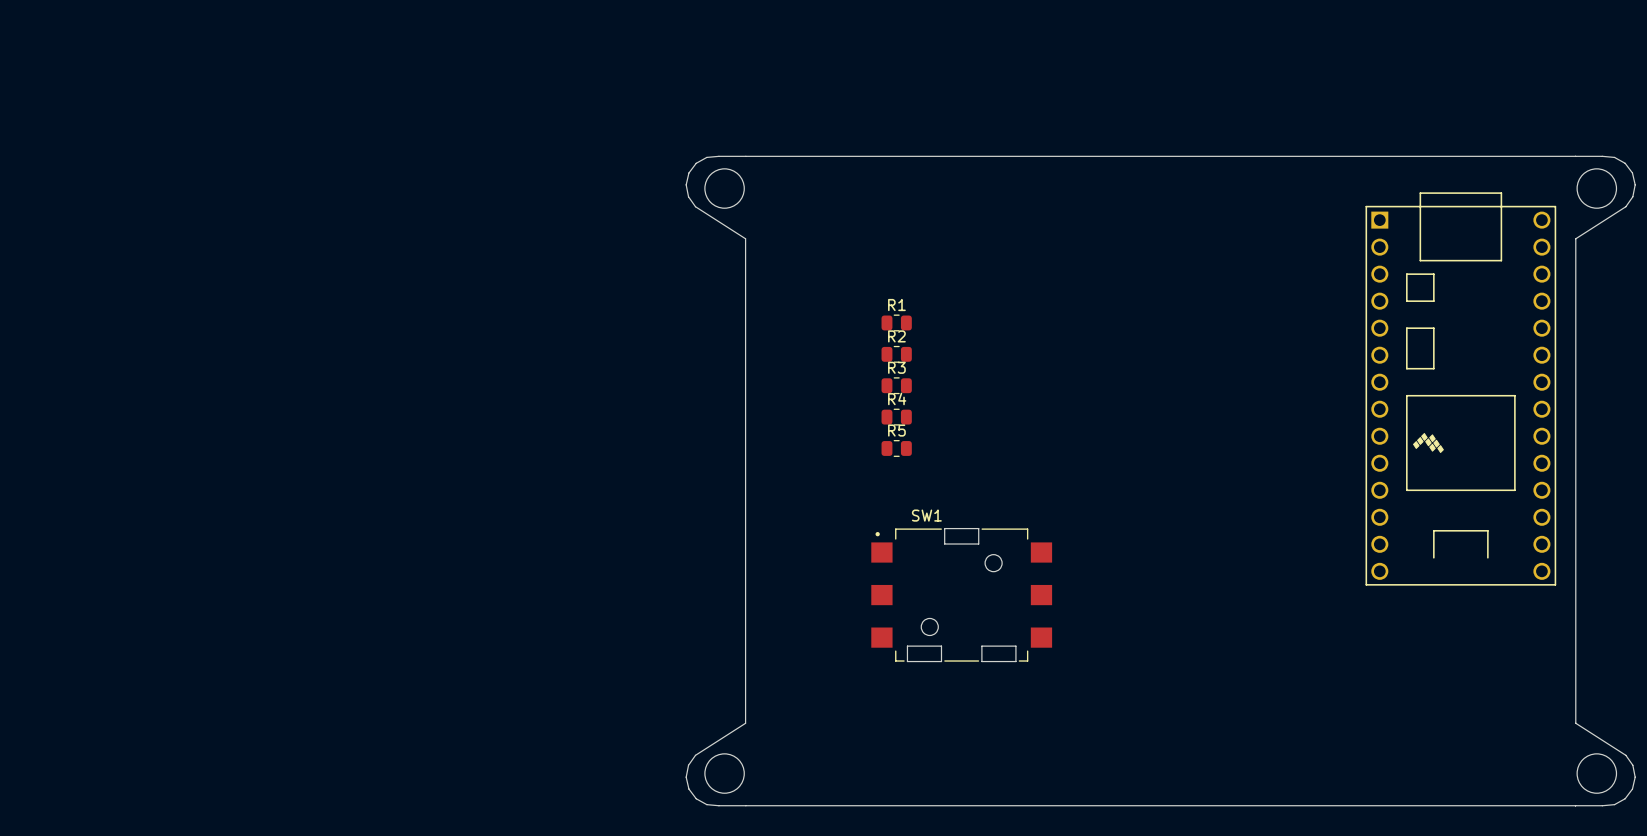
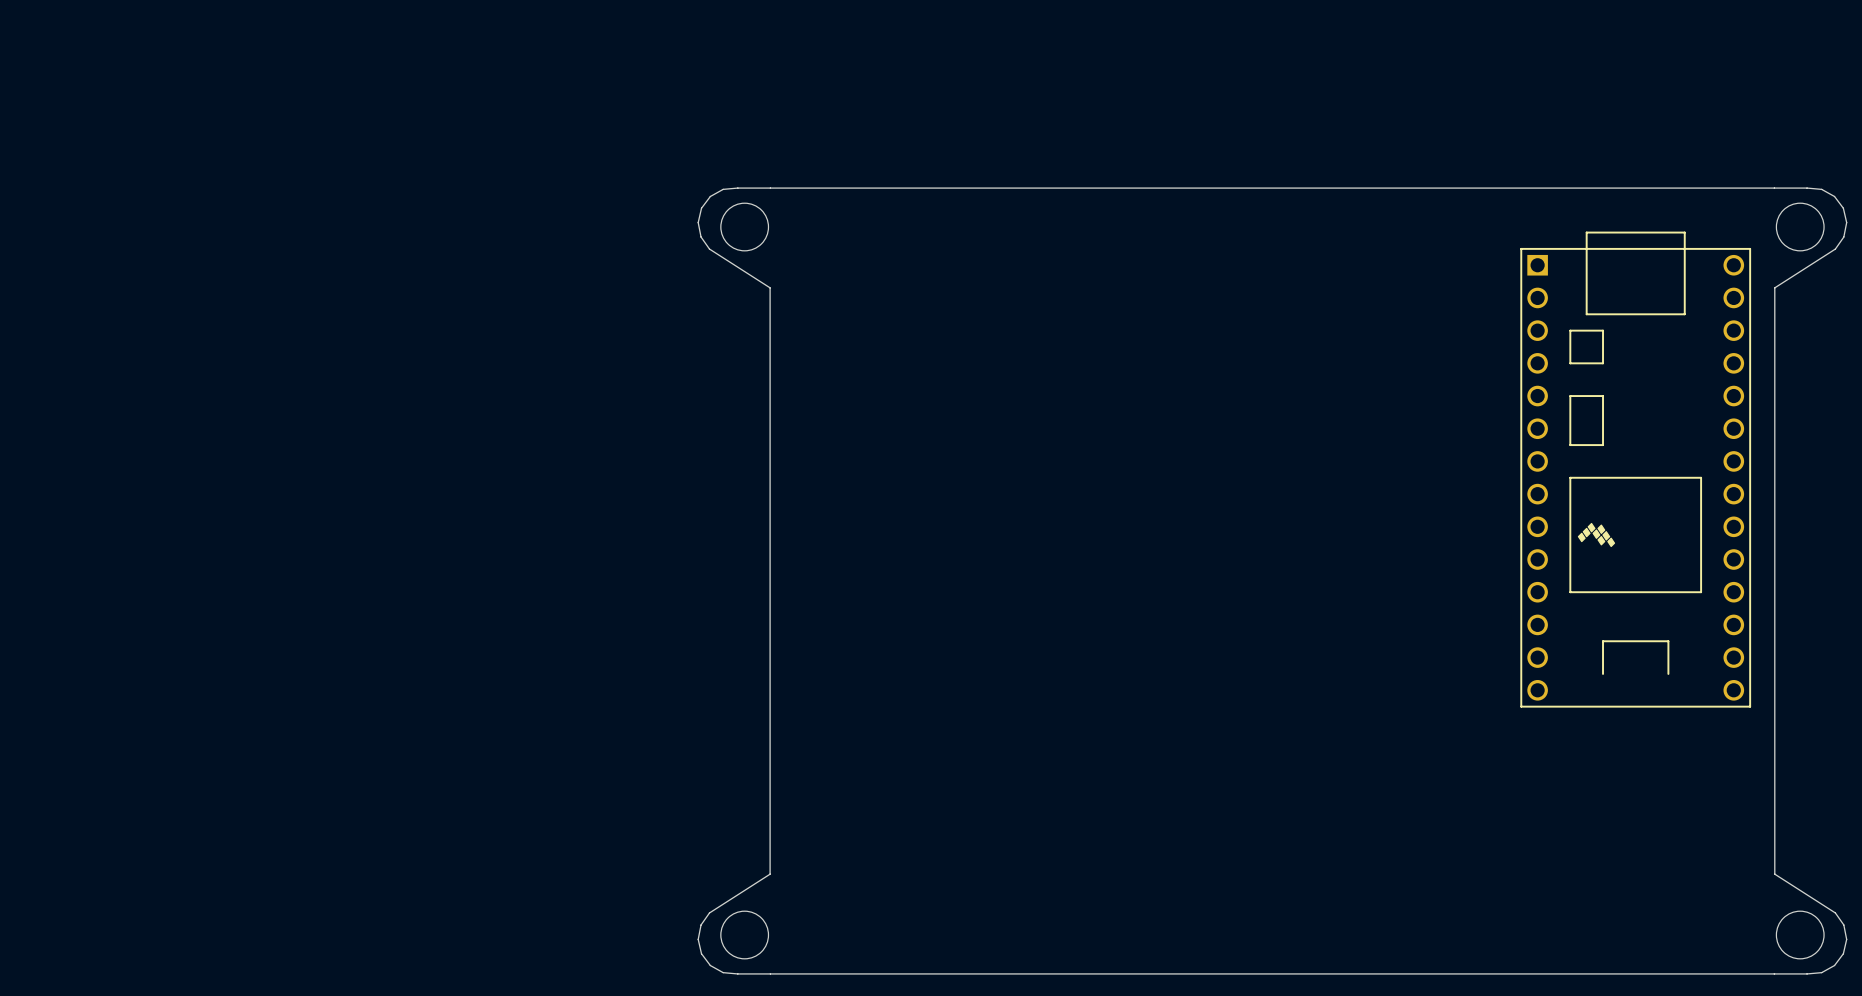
R1: (896, 322) -> none
R2: (896, 354) -> none
R3: (896, 385) -> none
R4: (896, 417) -> none
R5: (896, 448) -> none
SW1: (961, 595) -> none

